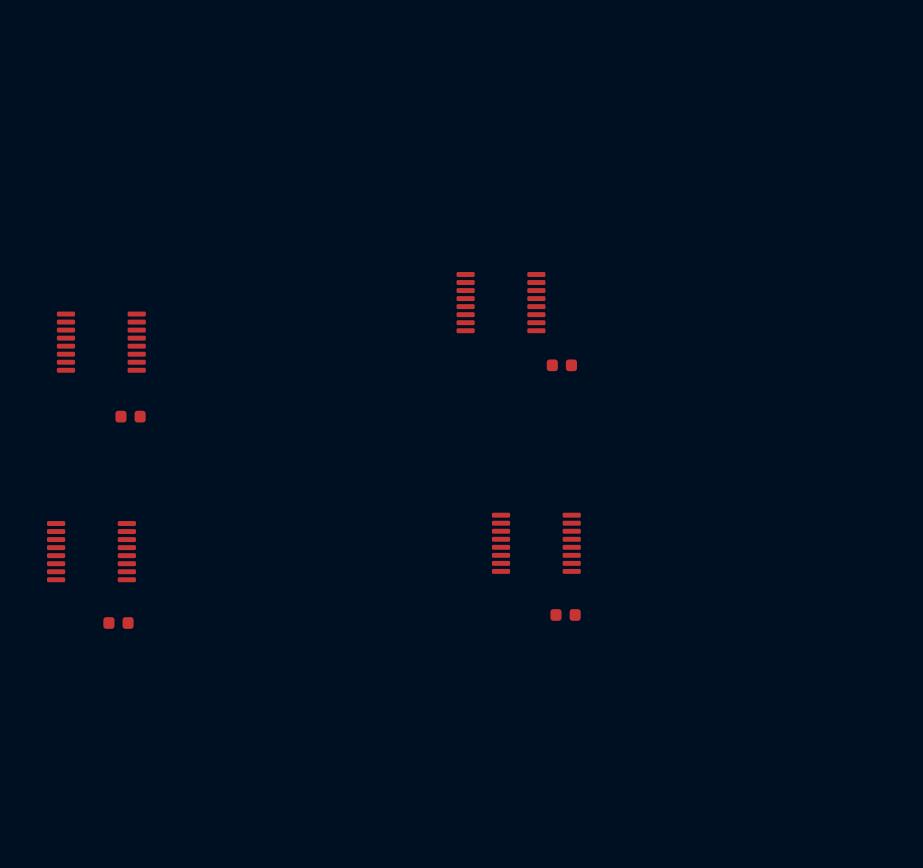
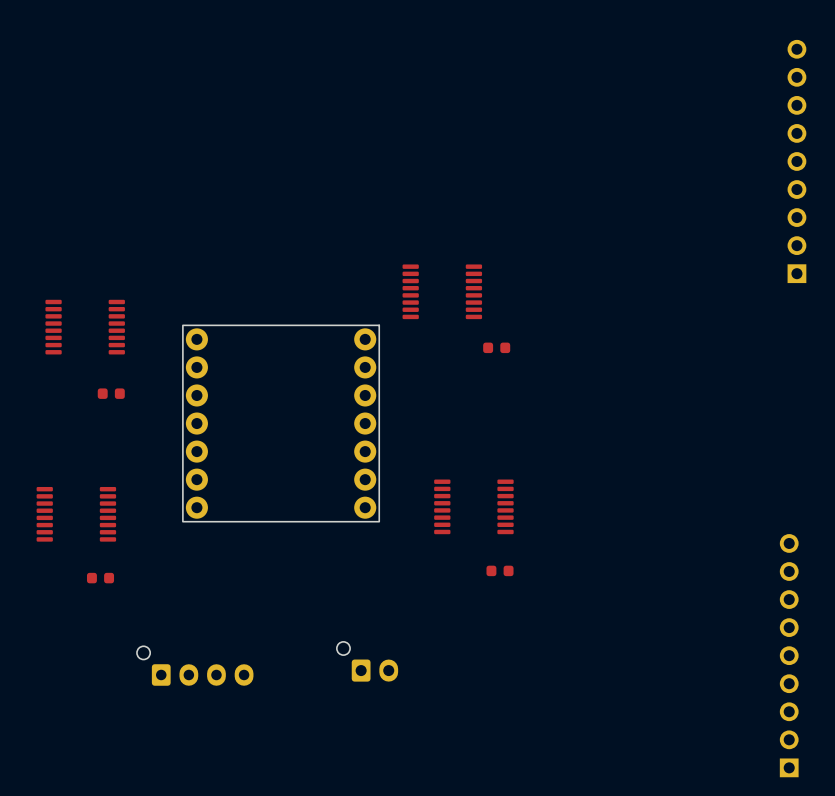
part: none -> (796, 161)
part: none -> (281, 423)
part: none -> (789, 655)
part: none -> (367, 661)
part: none -> (195, 666)

